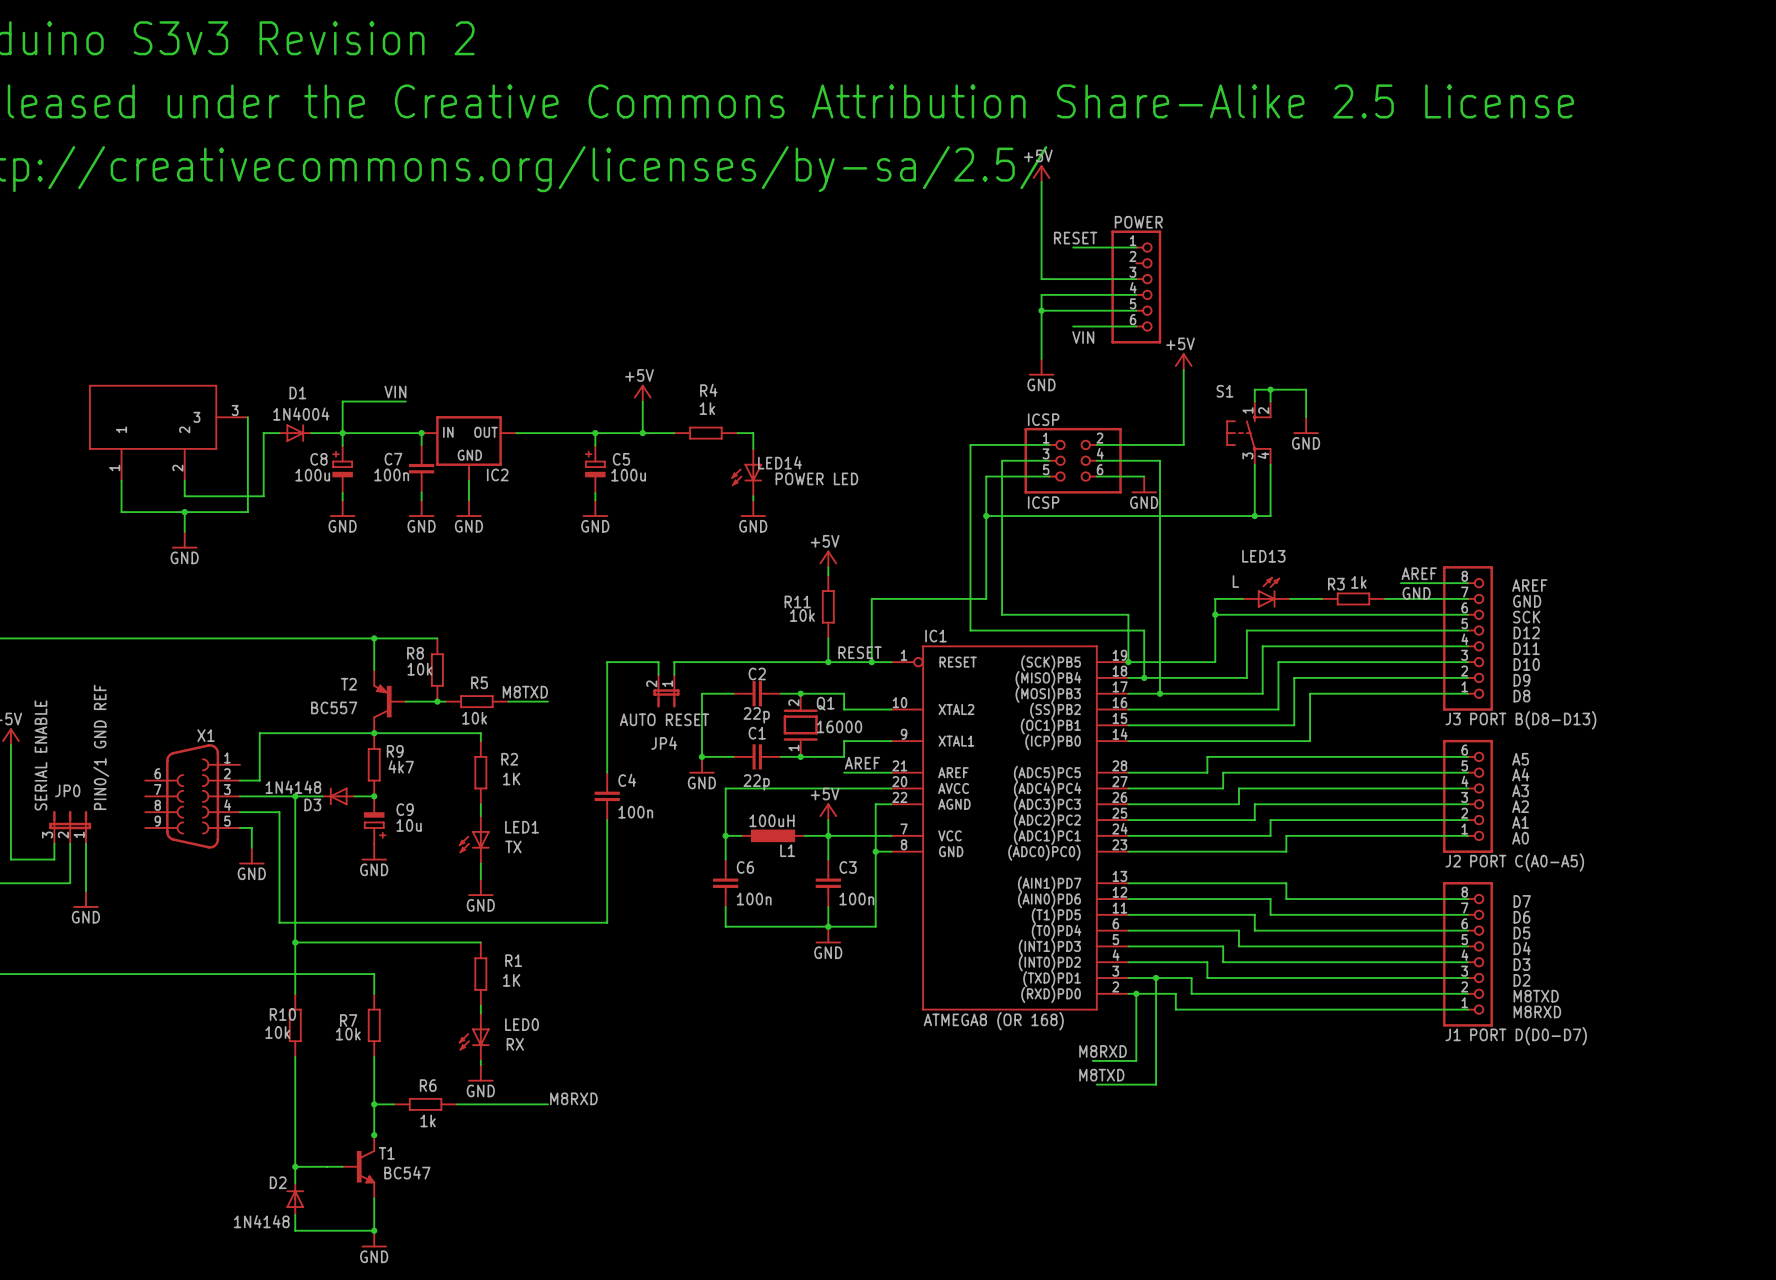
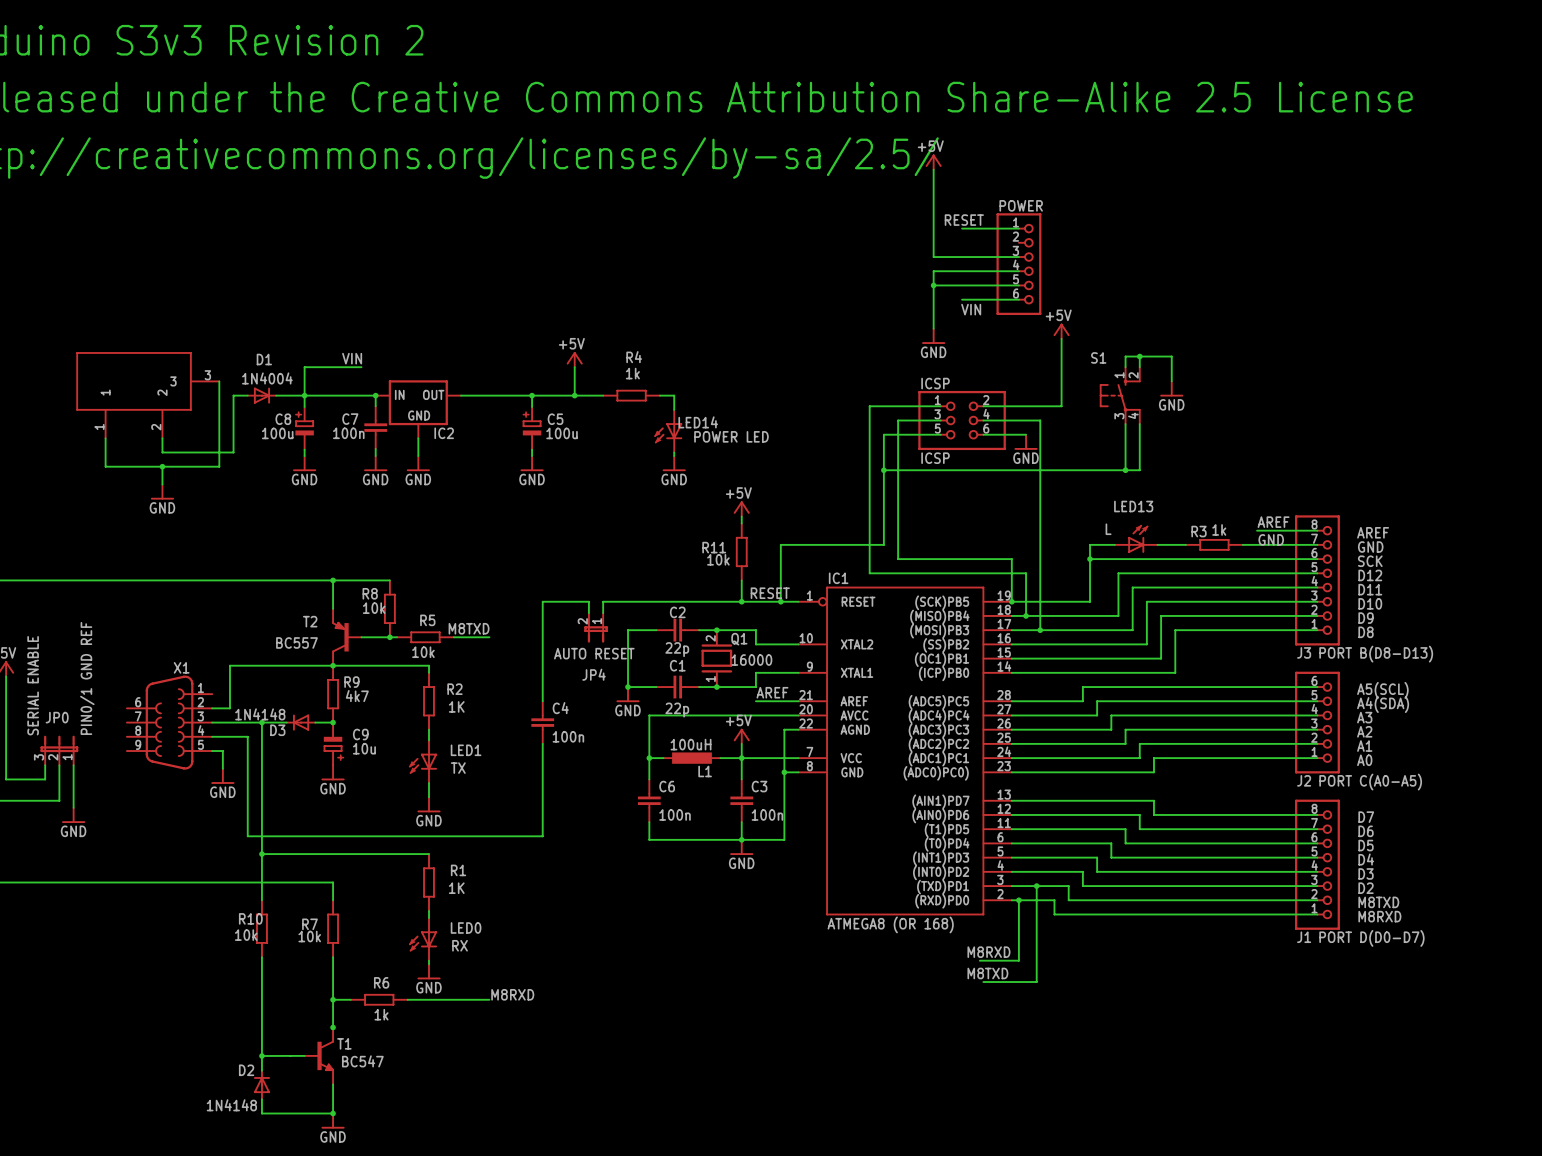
label: A5 (1520, 759) -> A5(SCL) (1382, 690)
label: A4 (1520, 774) -> A4(SDA) (1383, 704)

